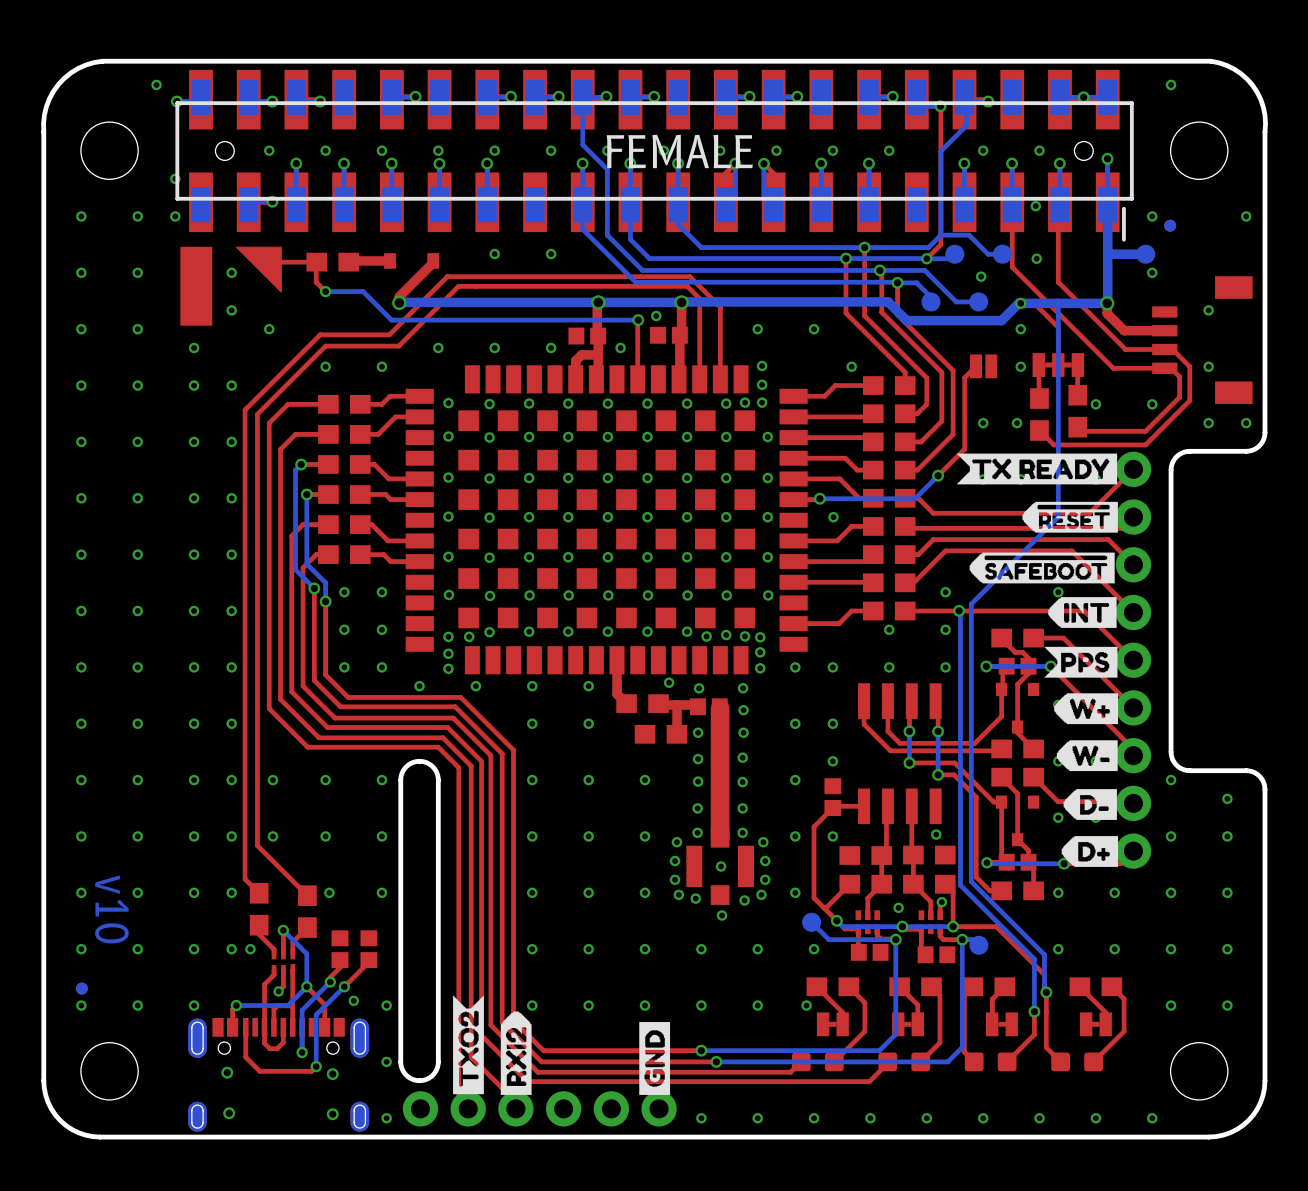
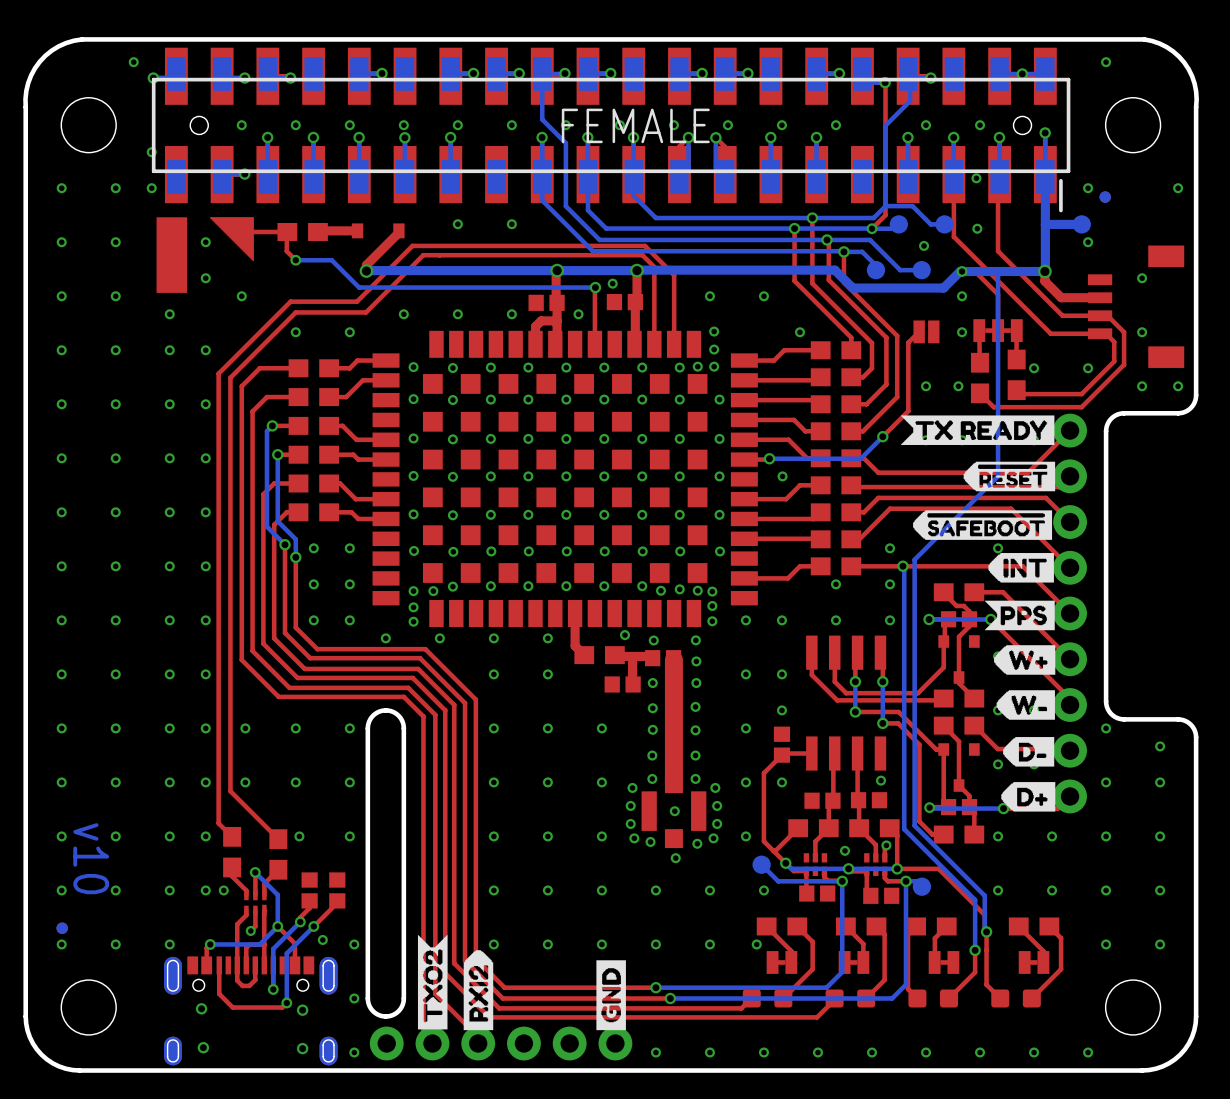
part footprint: [634, 724, 688, 744] -> [604, 676, 641, 693]
part footprint: [903, 845, 956, 865] -> [850, 792, 888, 809]
part footprint: [839, 846, 893, 865] -> [804, 792, 841, 809]

